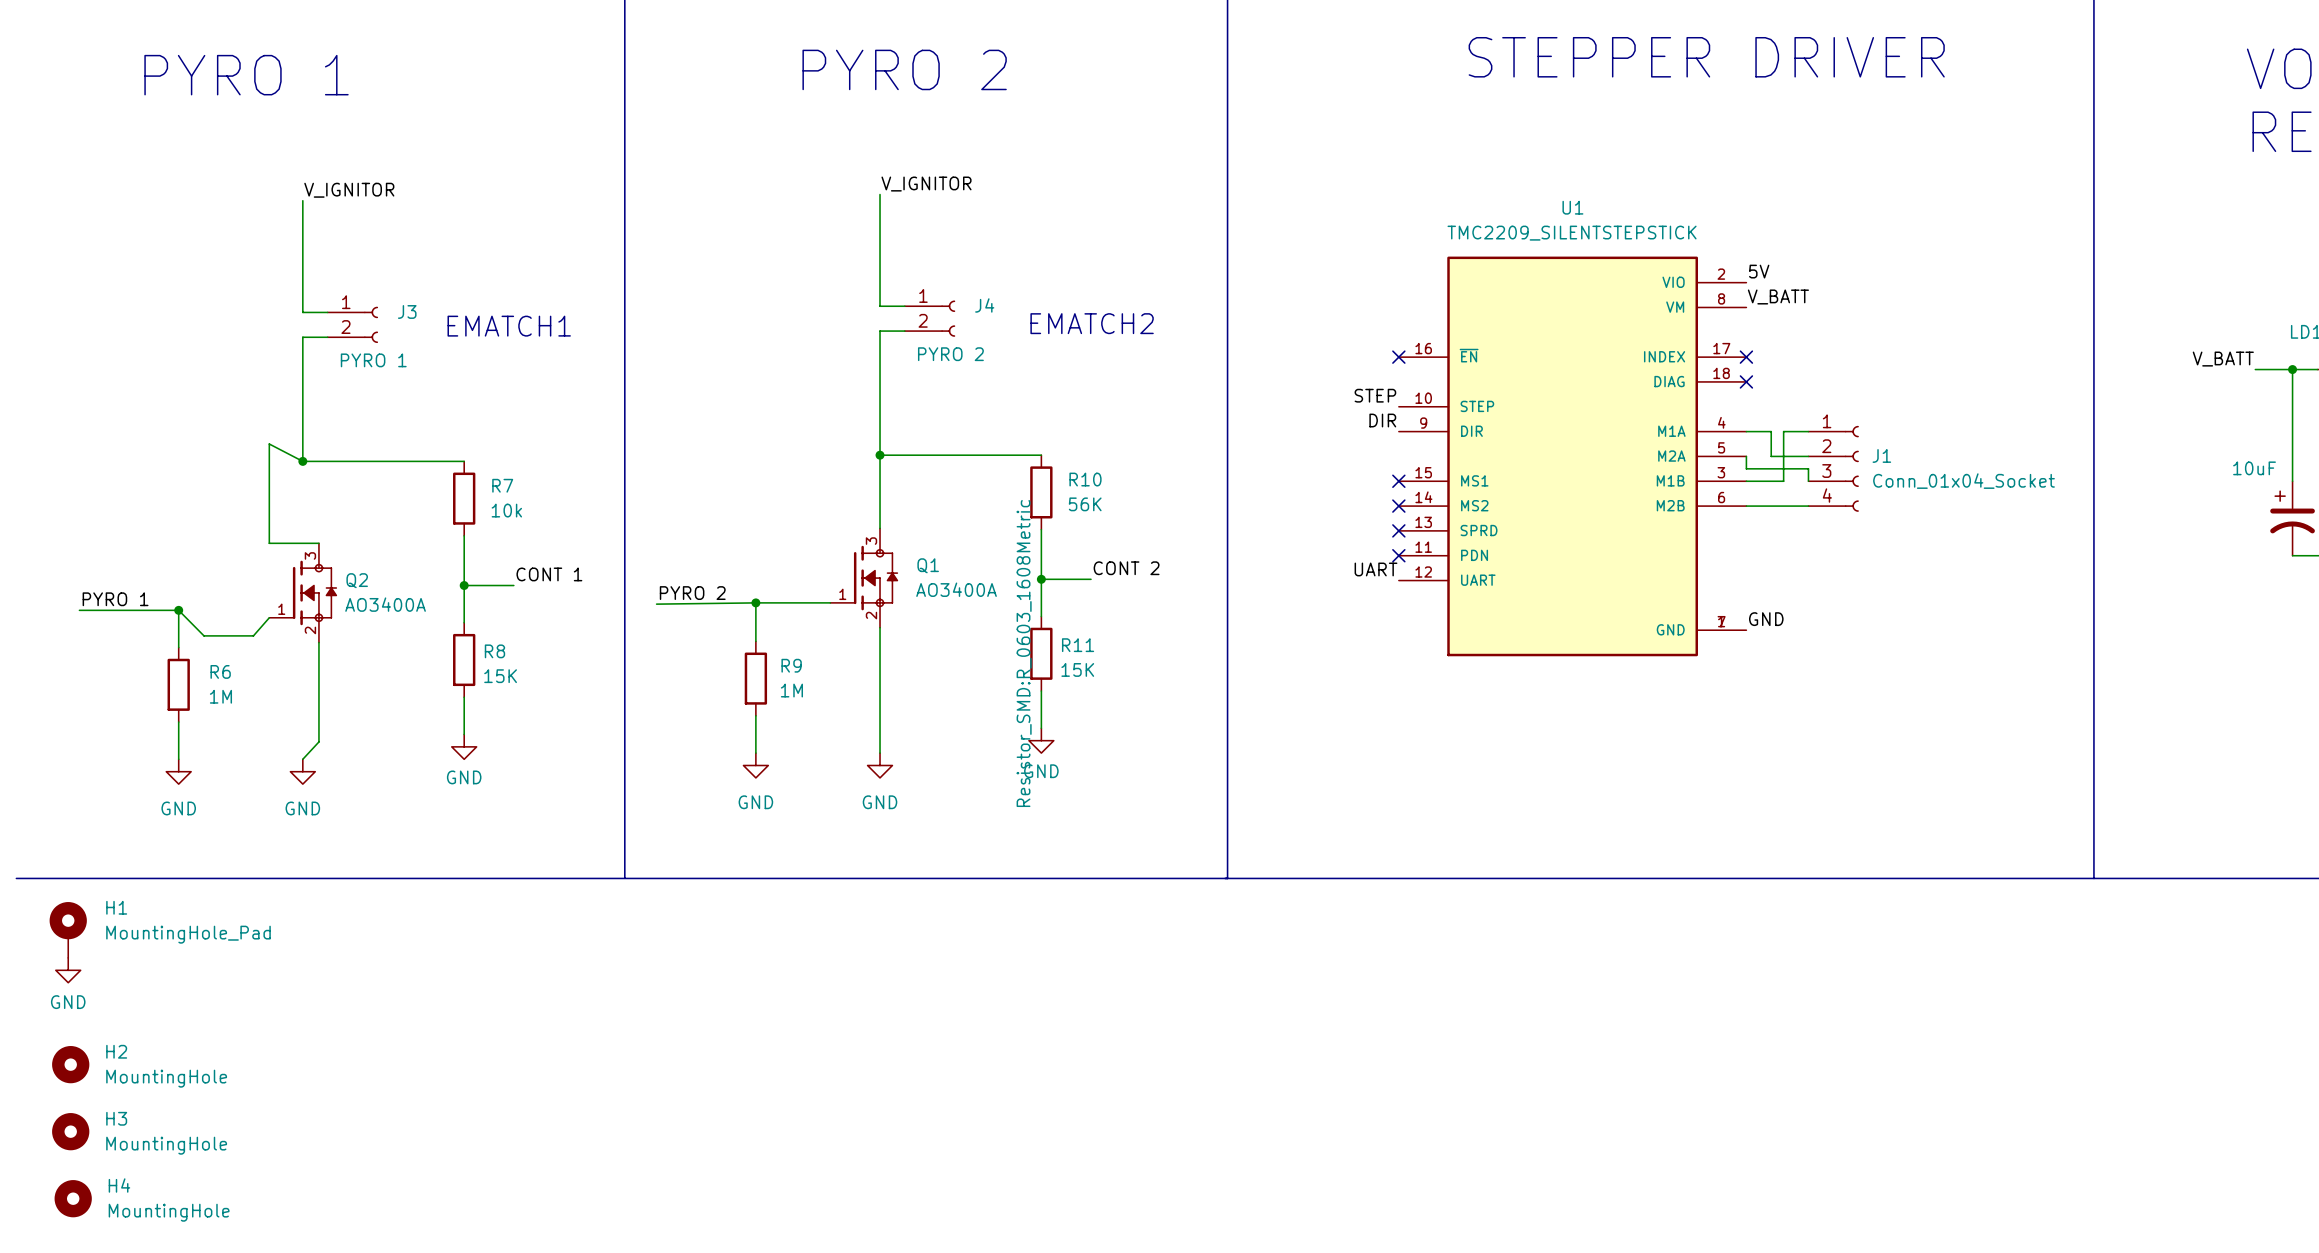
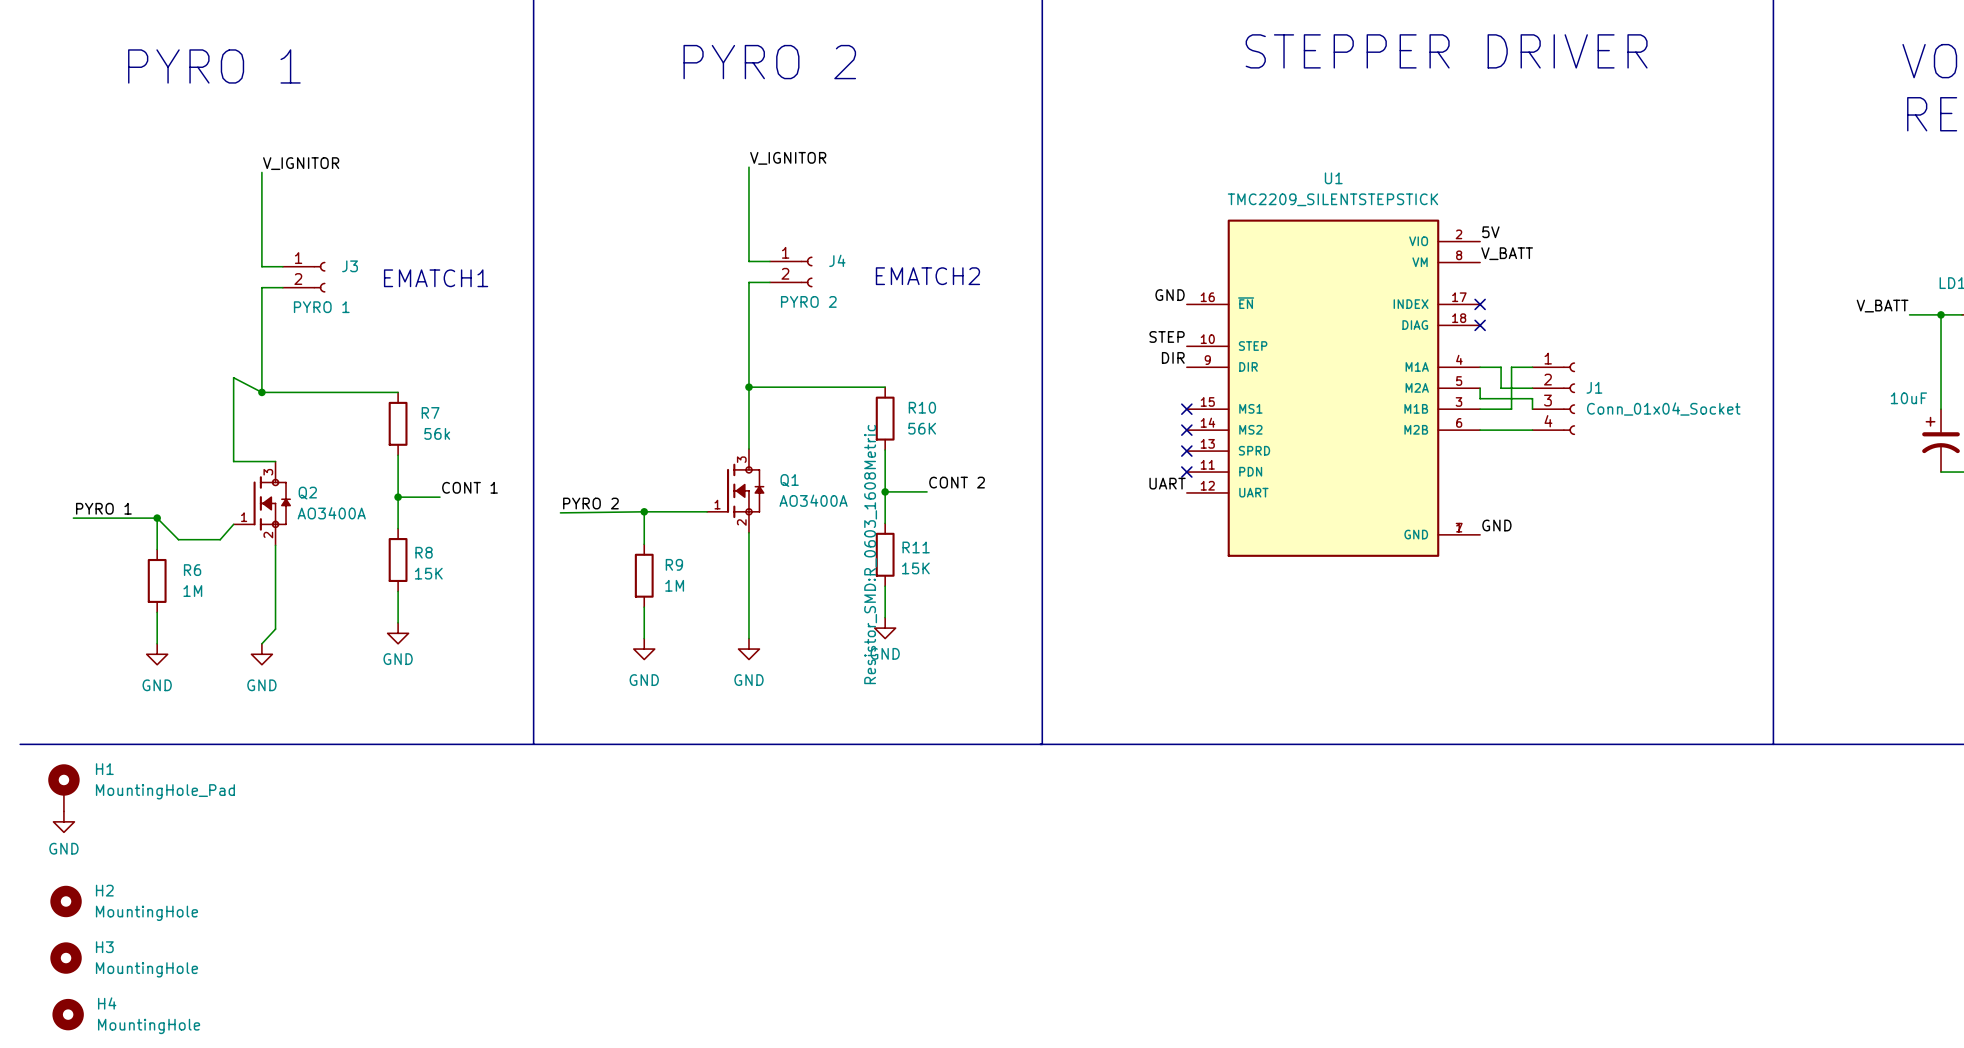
label: none -> GND (1170, 295)
no-connect mark: (1398, 357) -> none
R7 value: 10k (506, 510) -> 56k (437, 433)

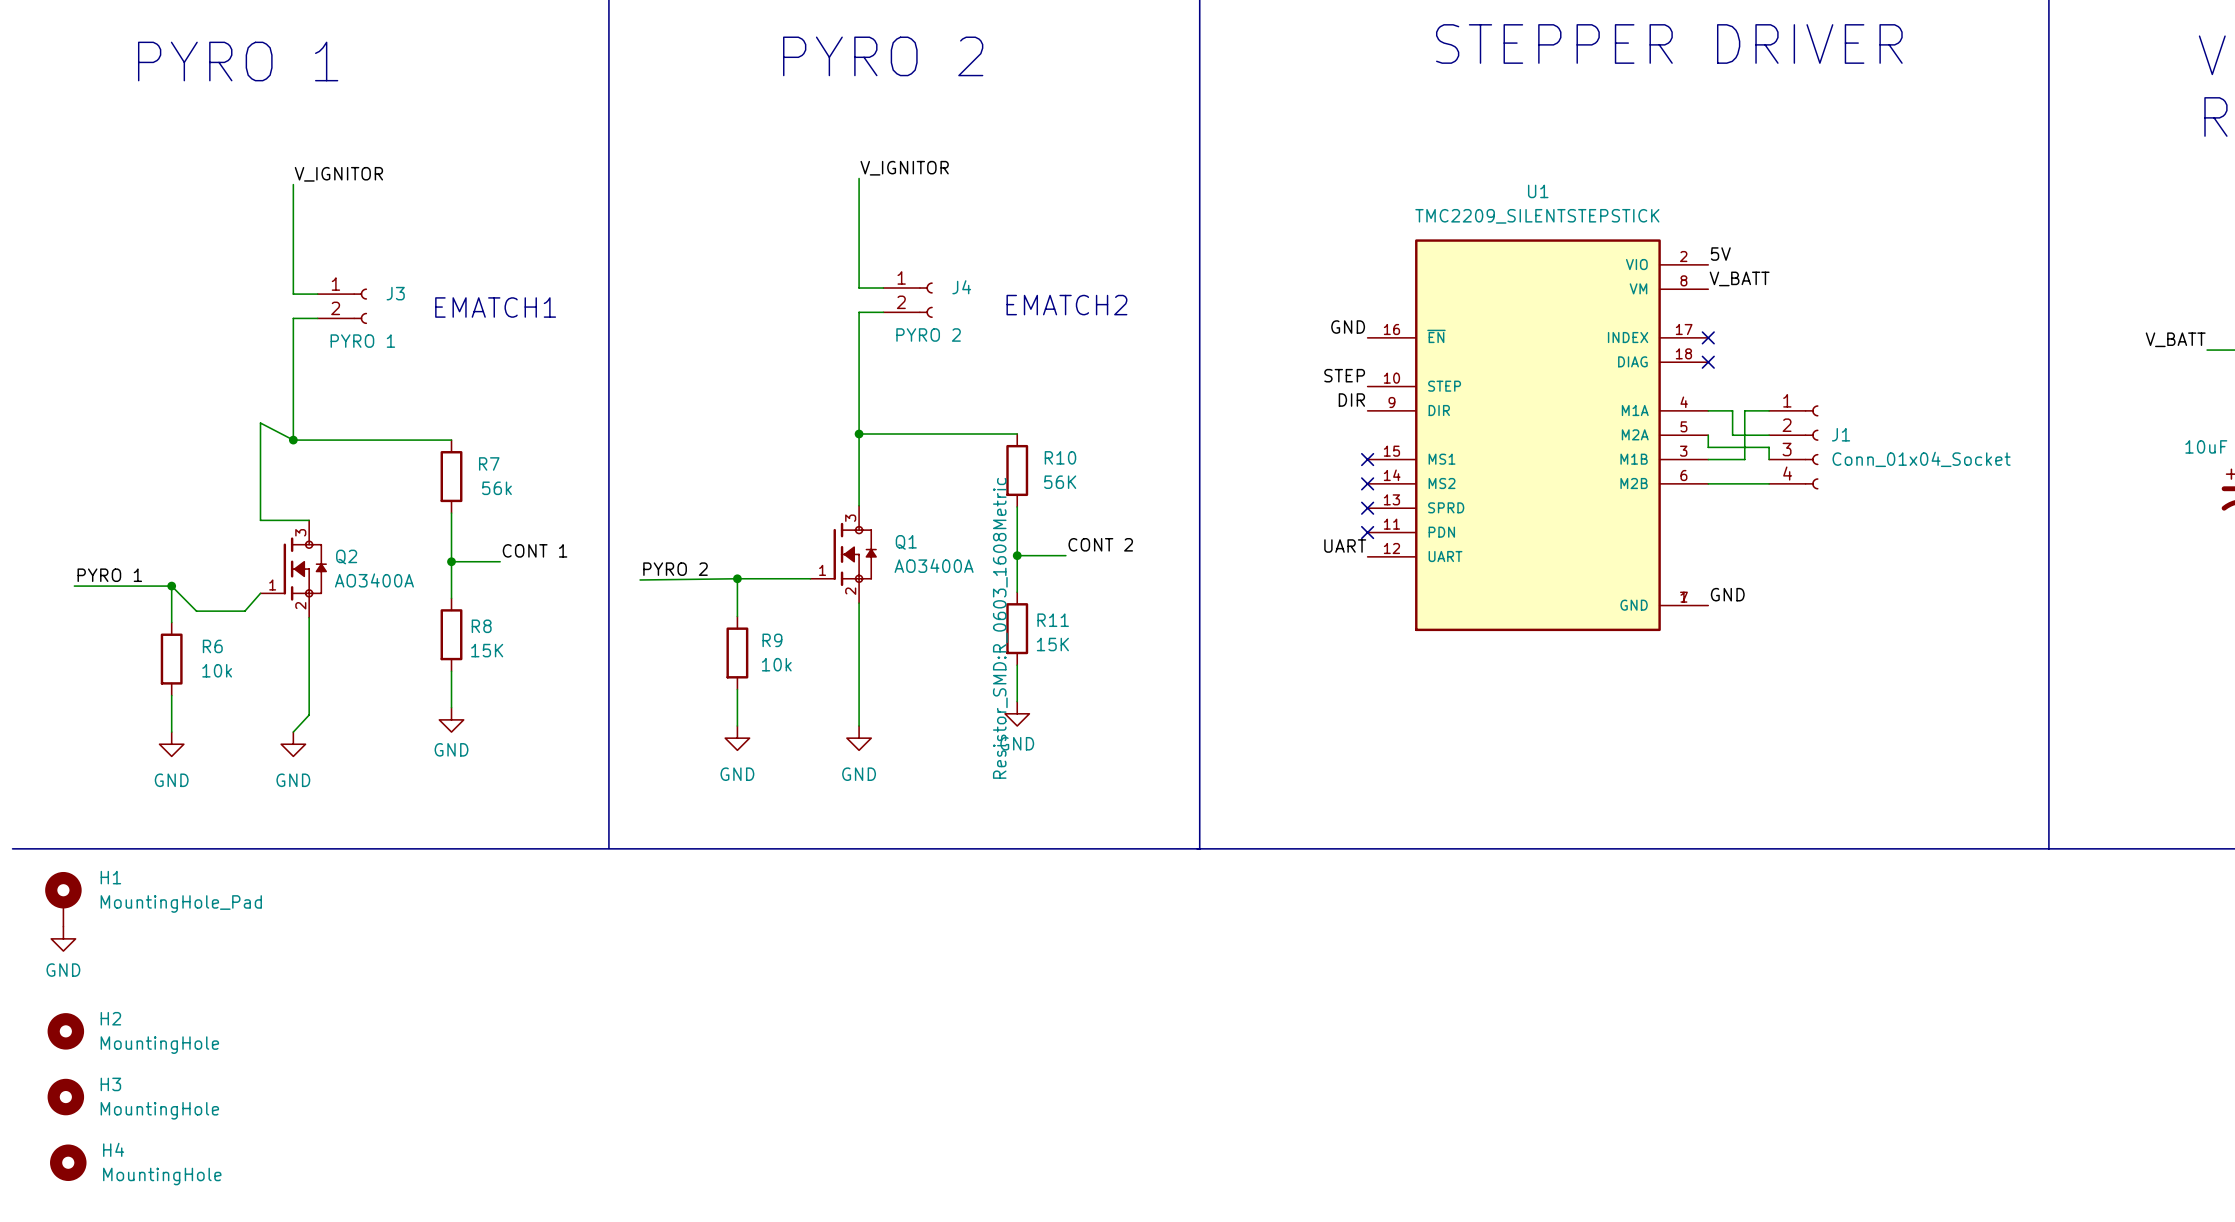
R9 value: 1M (674, 585) -> 10k (776, 664)
R6 value: 1M (192, 591) -> 10k (217, 670)

